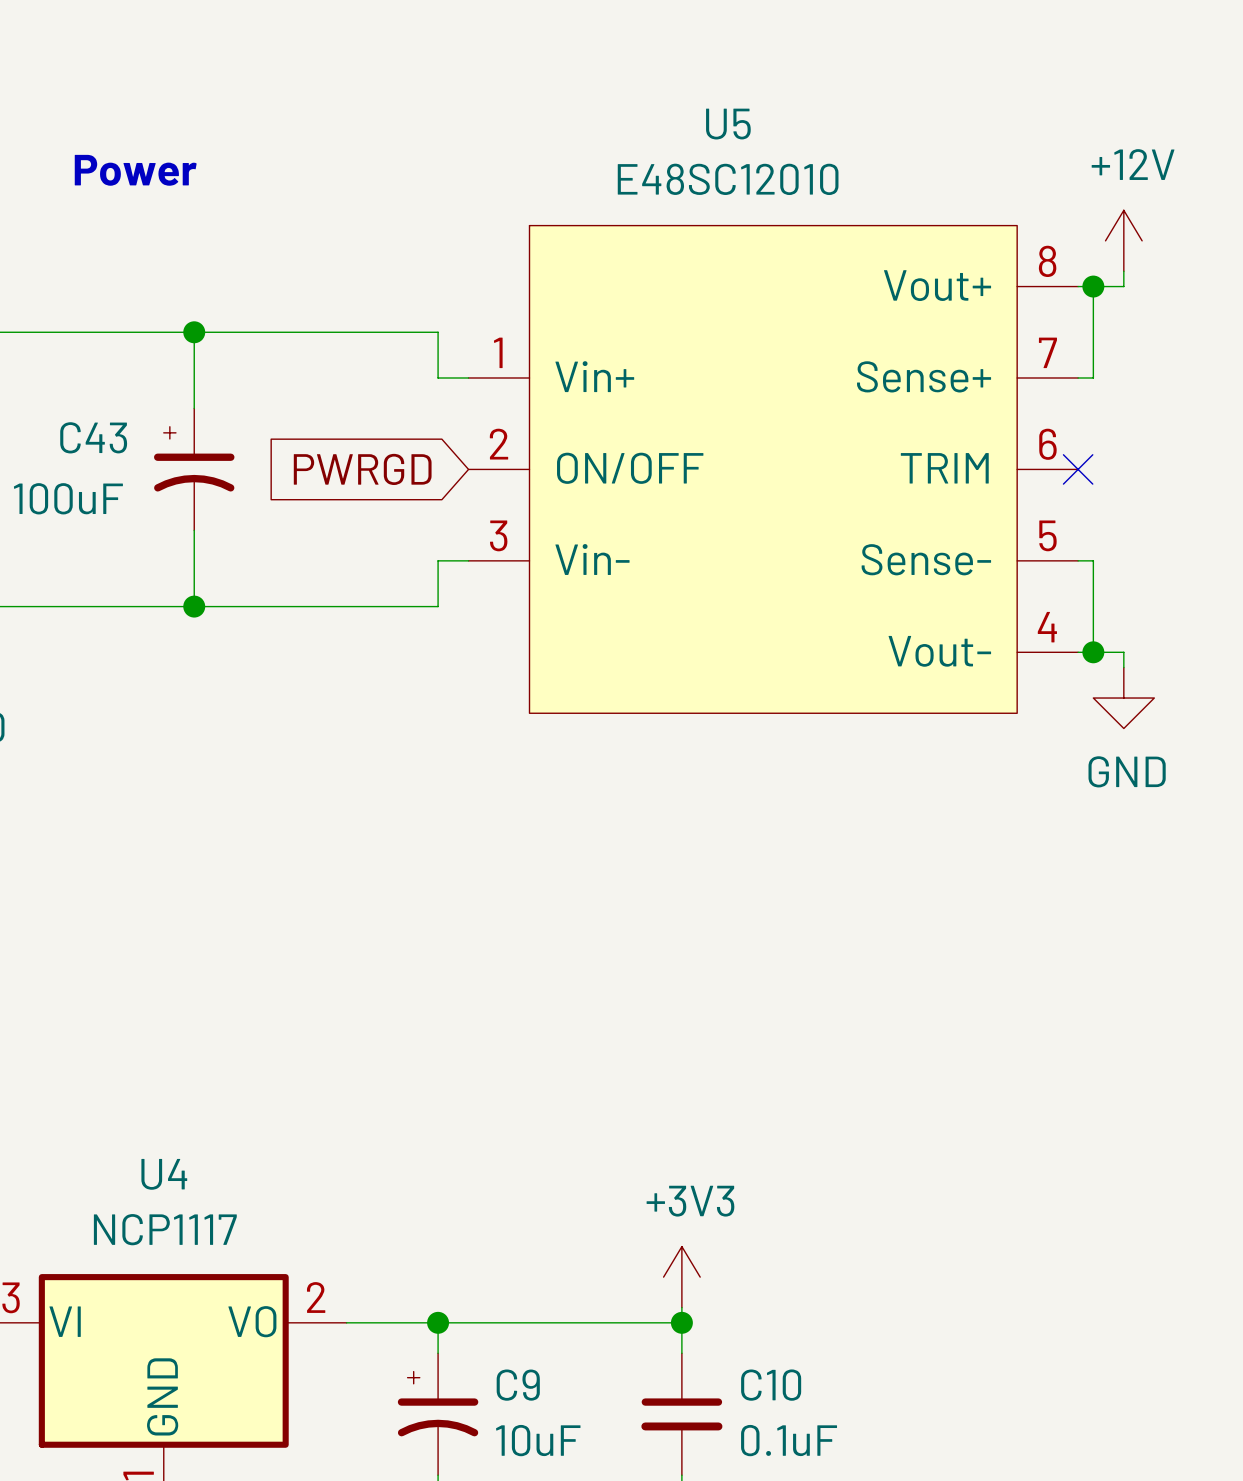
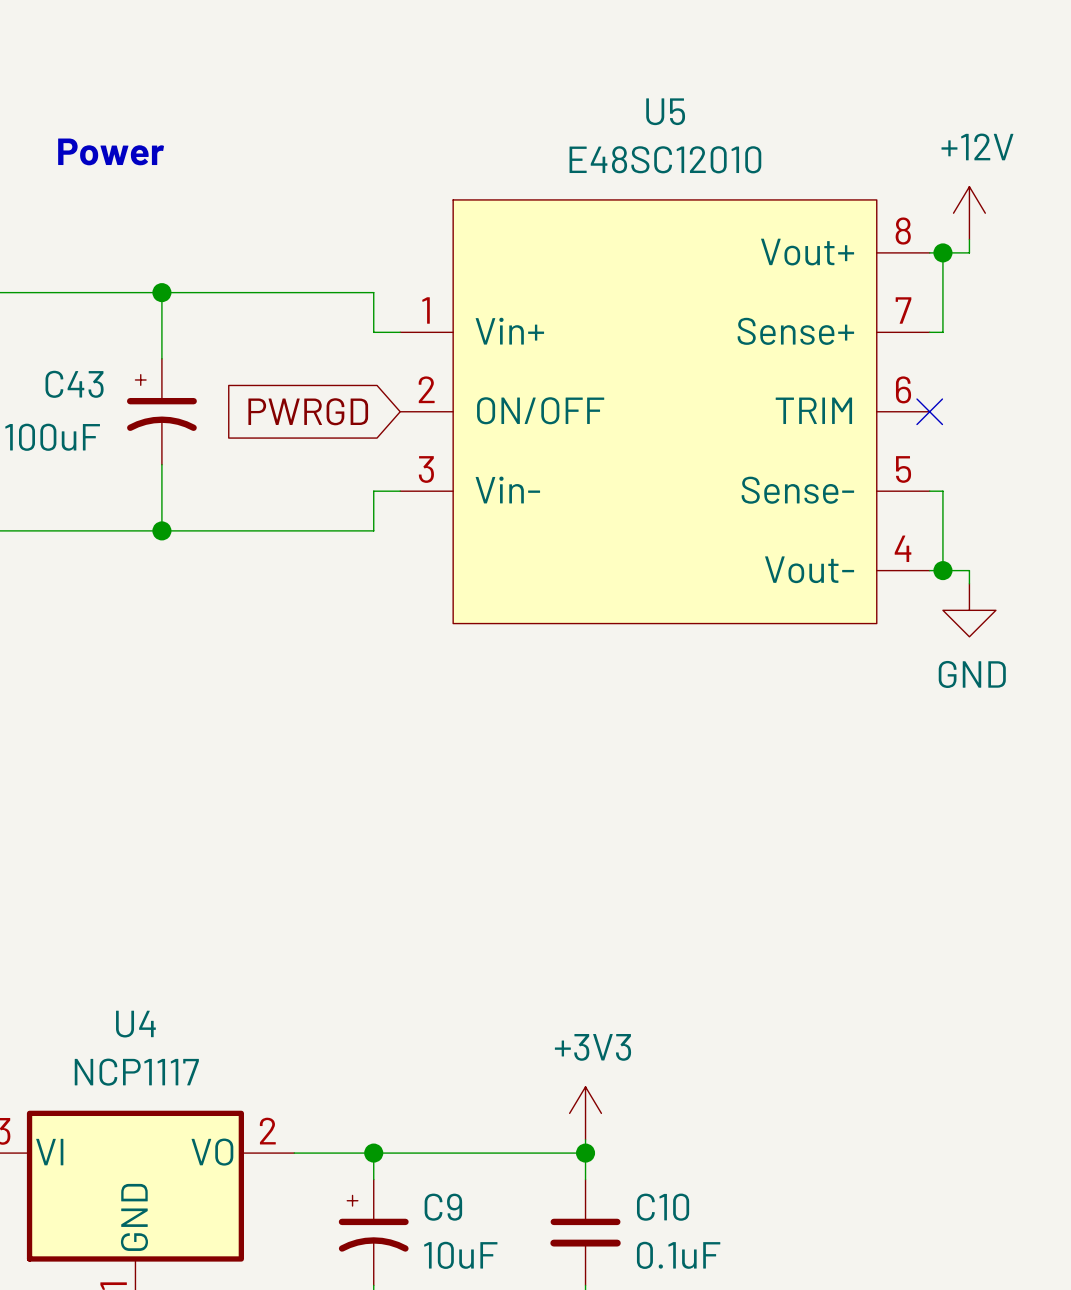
U5 name position: U5 (728, 124) -> U5 (665, 111)
U5 value position: E48SC12010 (728, 179) -> E48SC12010 (665, 159)

